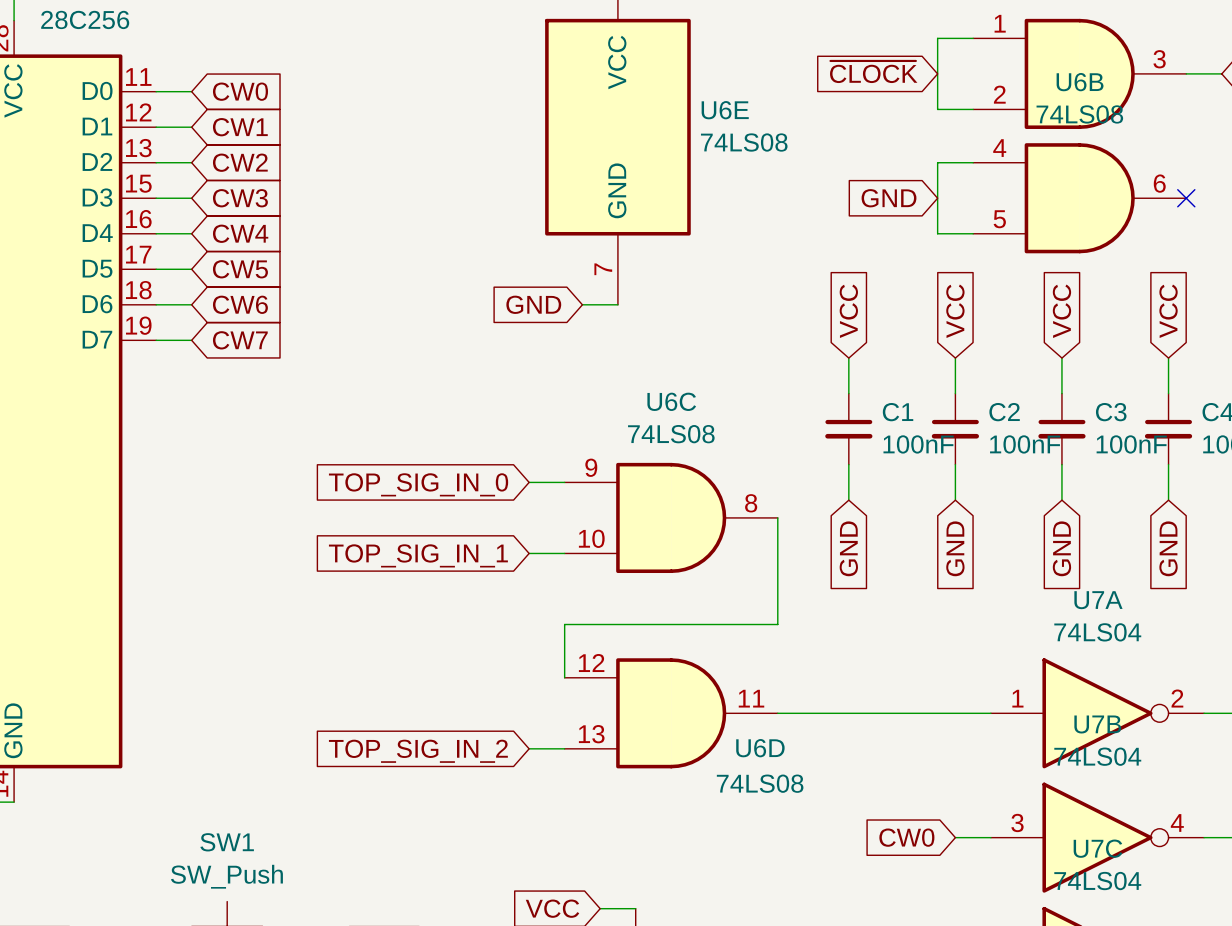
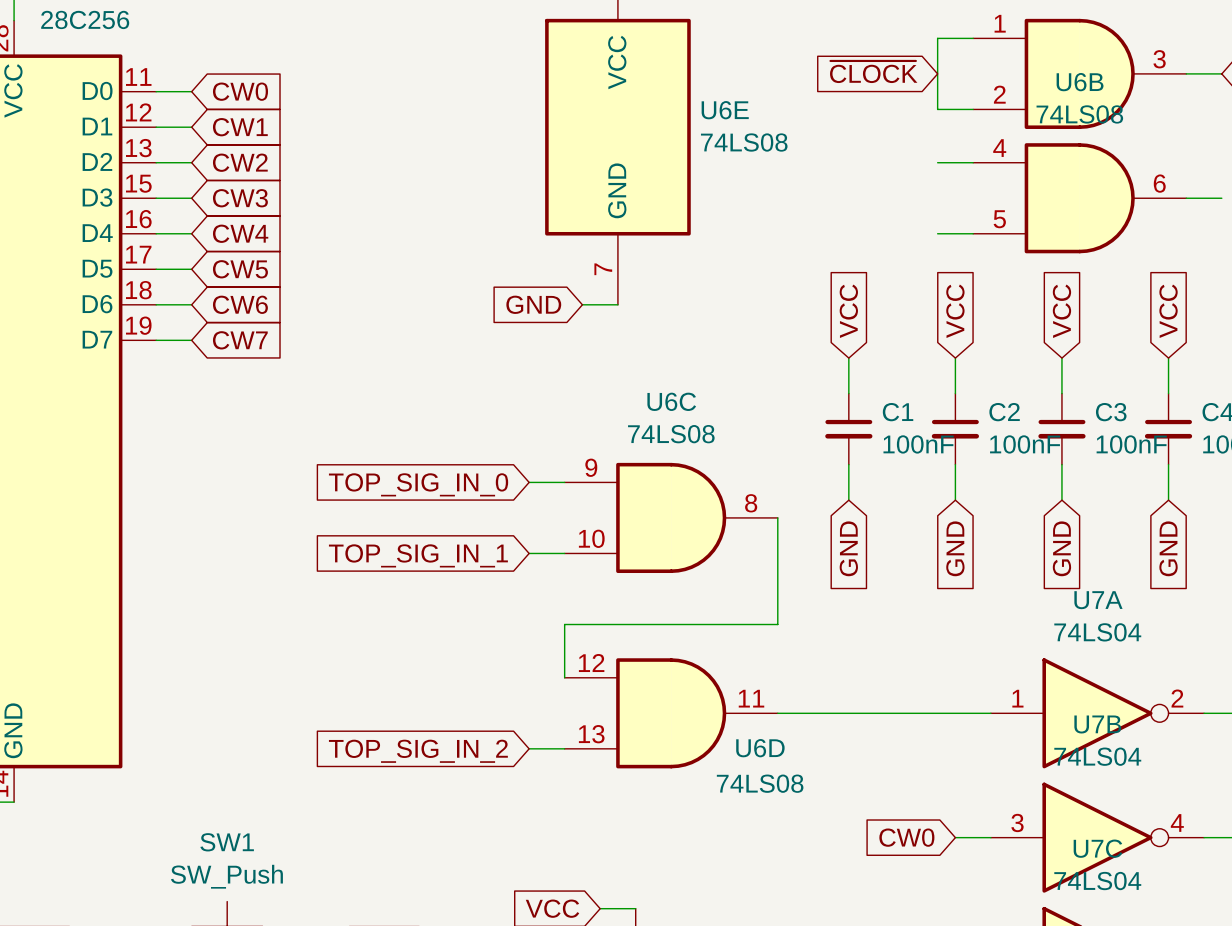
wire: (937, 162) (937, 233) -> none
global label: GND (889, 198) -> none
wire: none -> (1186, 198) (1221, 198)
no-connect mark: (1186, 198) -> none

